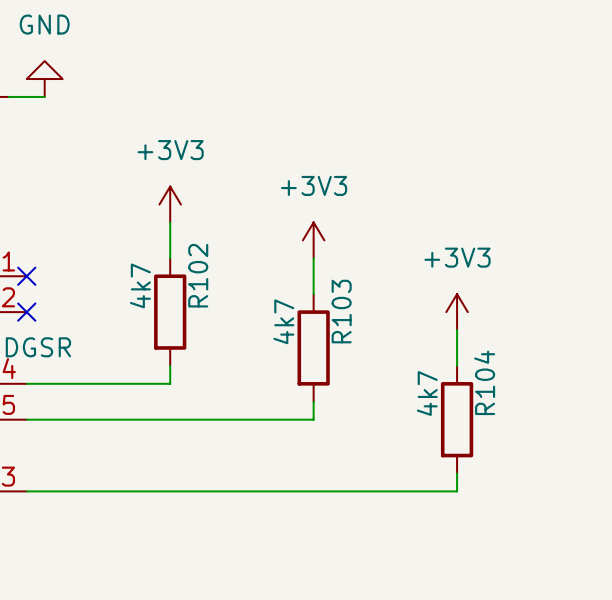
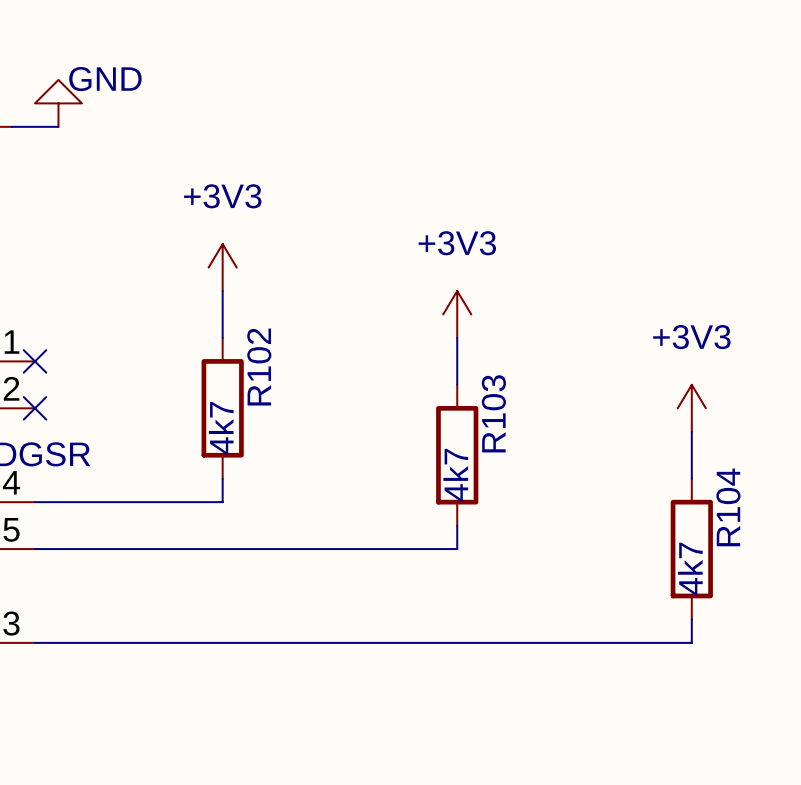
power symbol text position: GND (44, 24) -> GND (105, 79)
power symbol position: +3V3 (313, 240) -> +3V3 (457, 314)
wire: (313, 258) (313, 294) -> (457, 337) (457, 384)
R102 value position: 4k7 (140, 285) -> 4k7 (221, 428)
power symbol: +3V3 (457, 312) -> none
power symbol: none -> +3V3 (691, 408)
R103 value position: 4k7 (283, 321) -> 4k7 (455, 475)
wire: (457, 330) (457, 365) -> (691, 431) (691, 478)
R103 position: (313, 347) -> (457, 455)
R104 value position: 4k7 (427, 393) -> 4k7 (690, 568)
wire: (313, 401) (313, 419) -> (457, 525) (457, 549) (410, 549)
R104 position: (457, 419) -> (691, 549)
wire: (457, 473) (457, 491) -> (691, 619) (691, 642) (597, 642)

